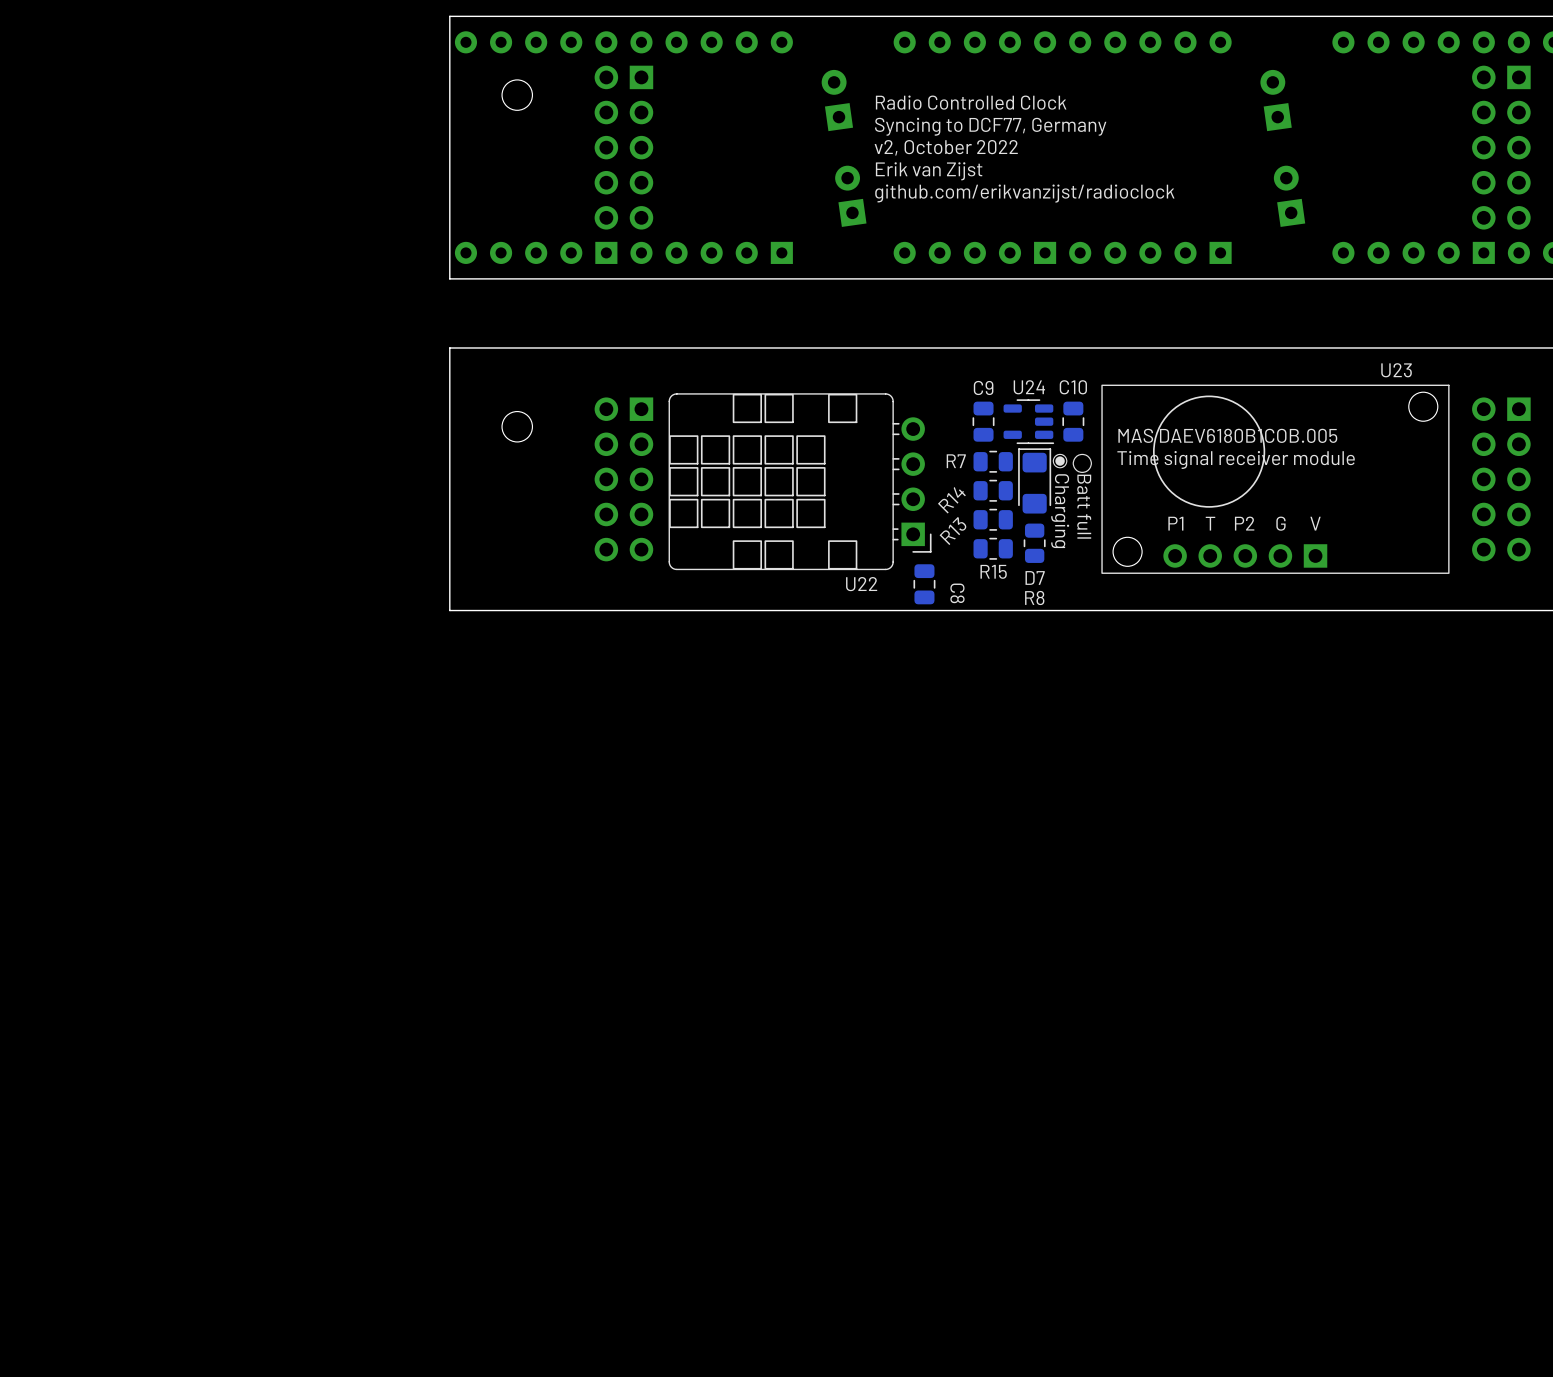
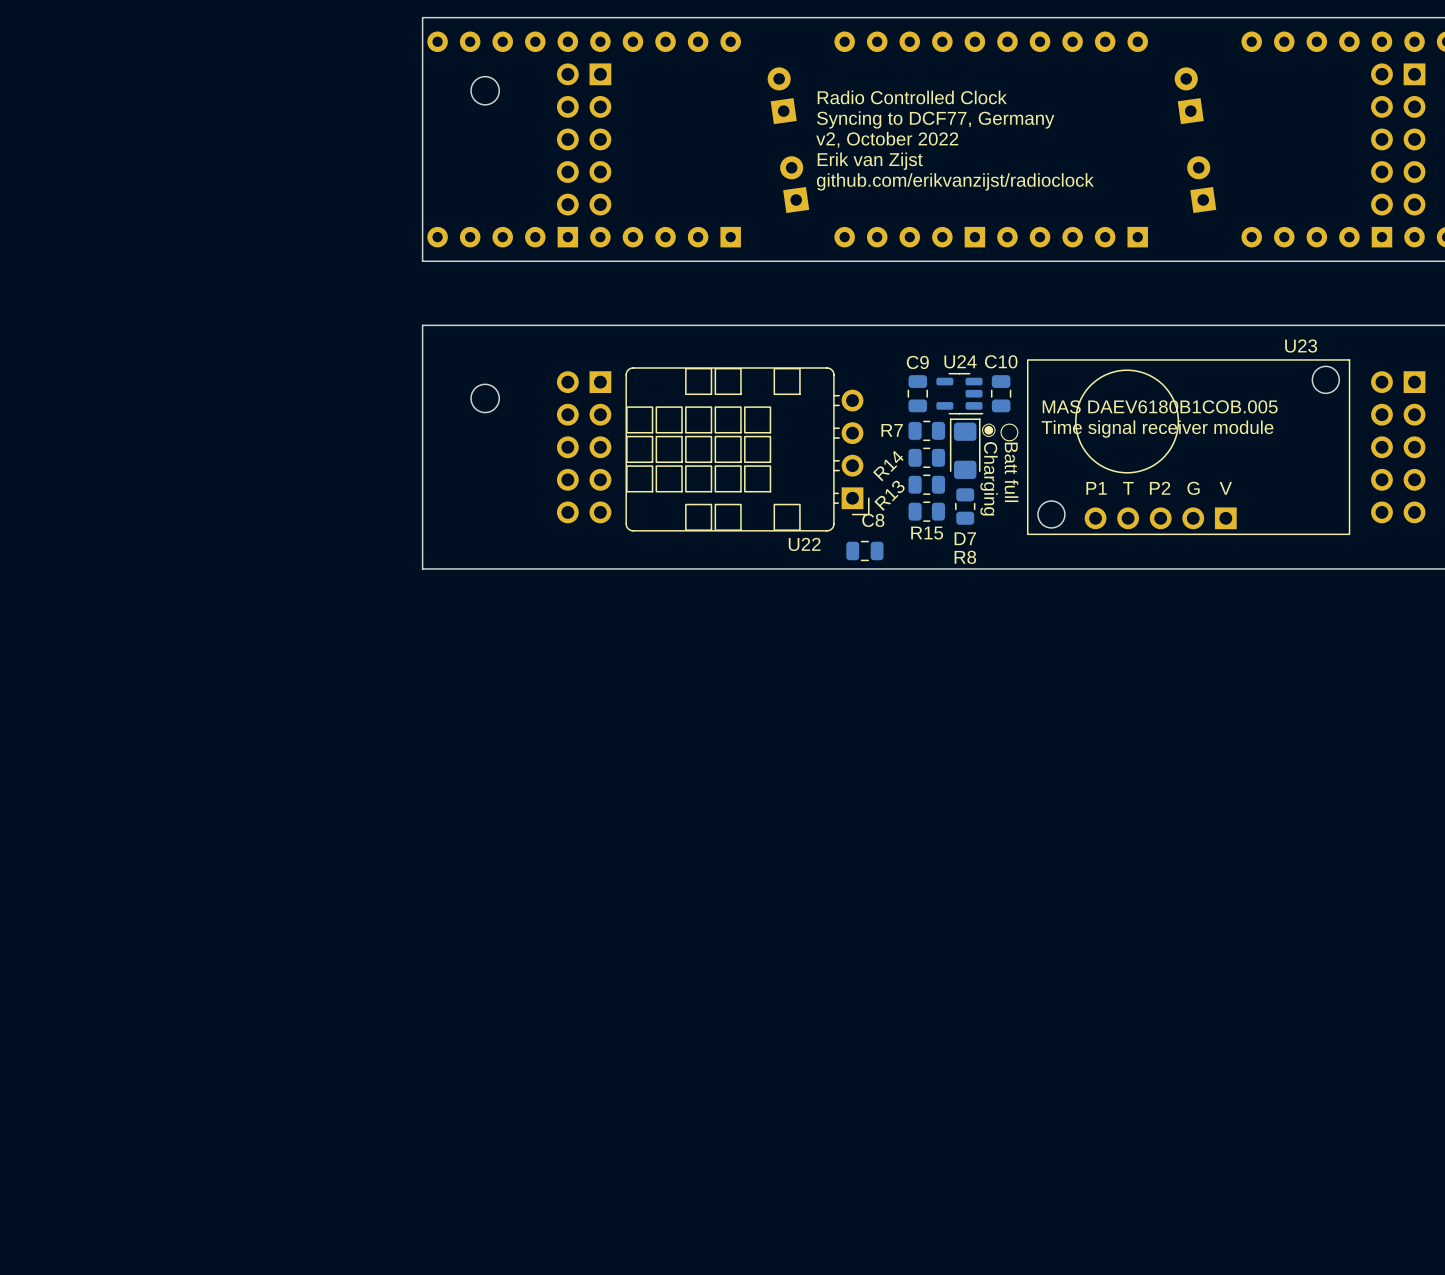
C8 rotation: 0° (924, 584) -> 90° clockwise (864, 551)
C8 name position: C8 (957, 593) -> C8 (873, 520)

